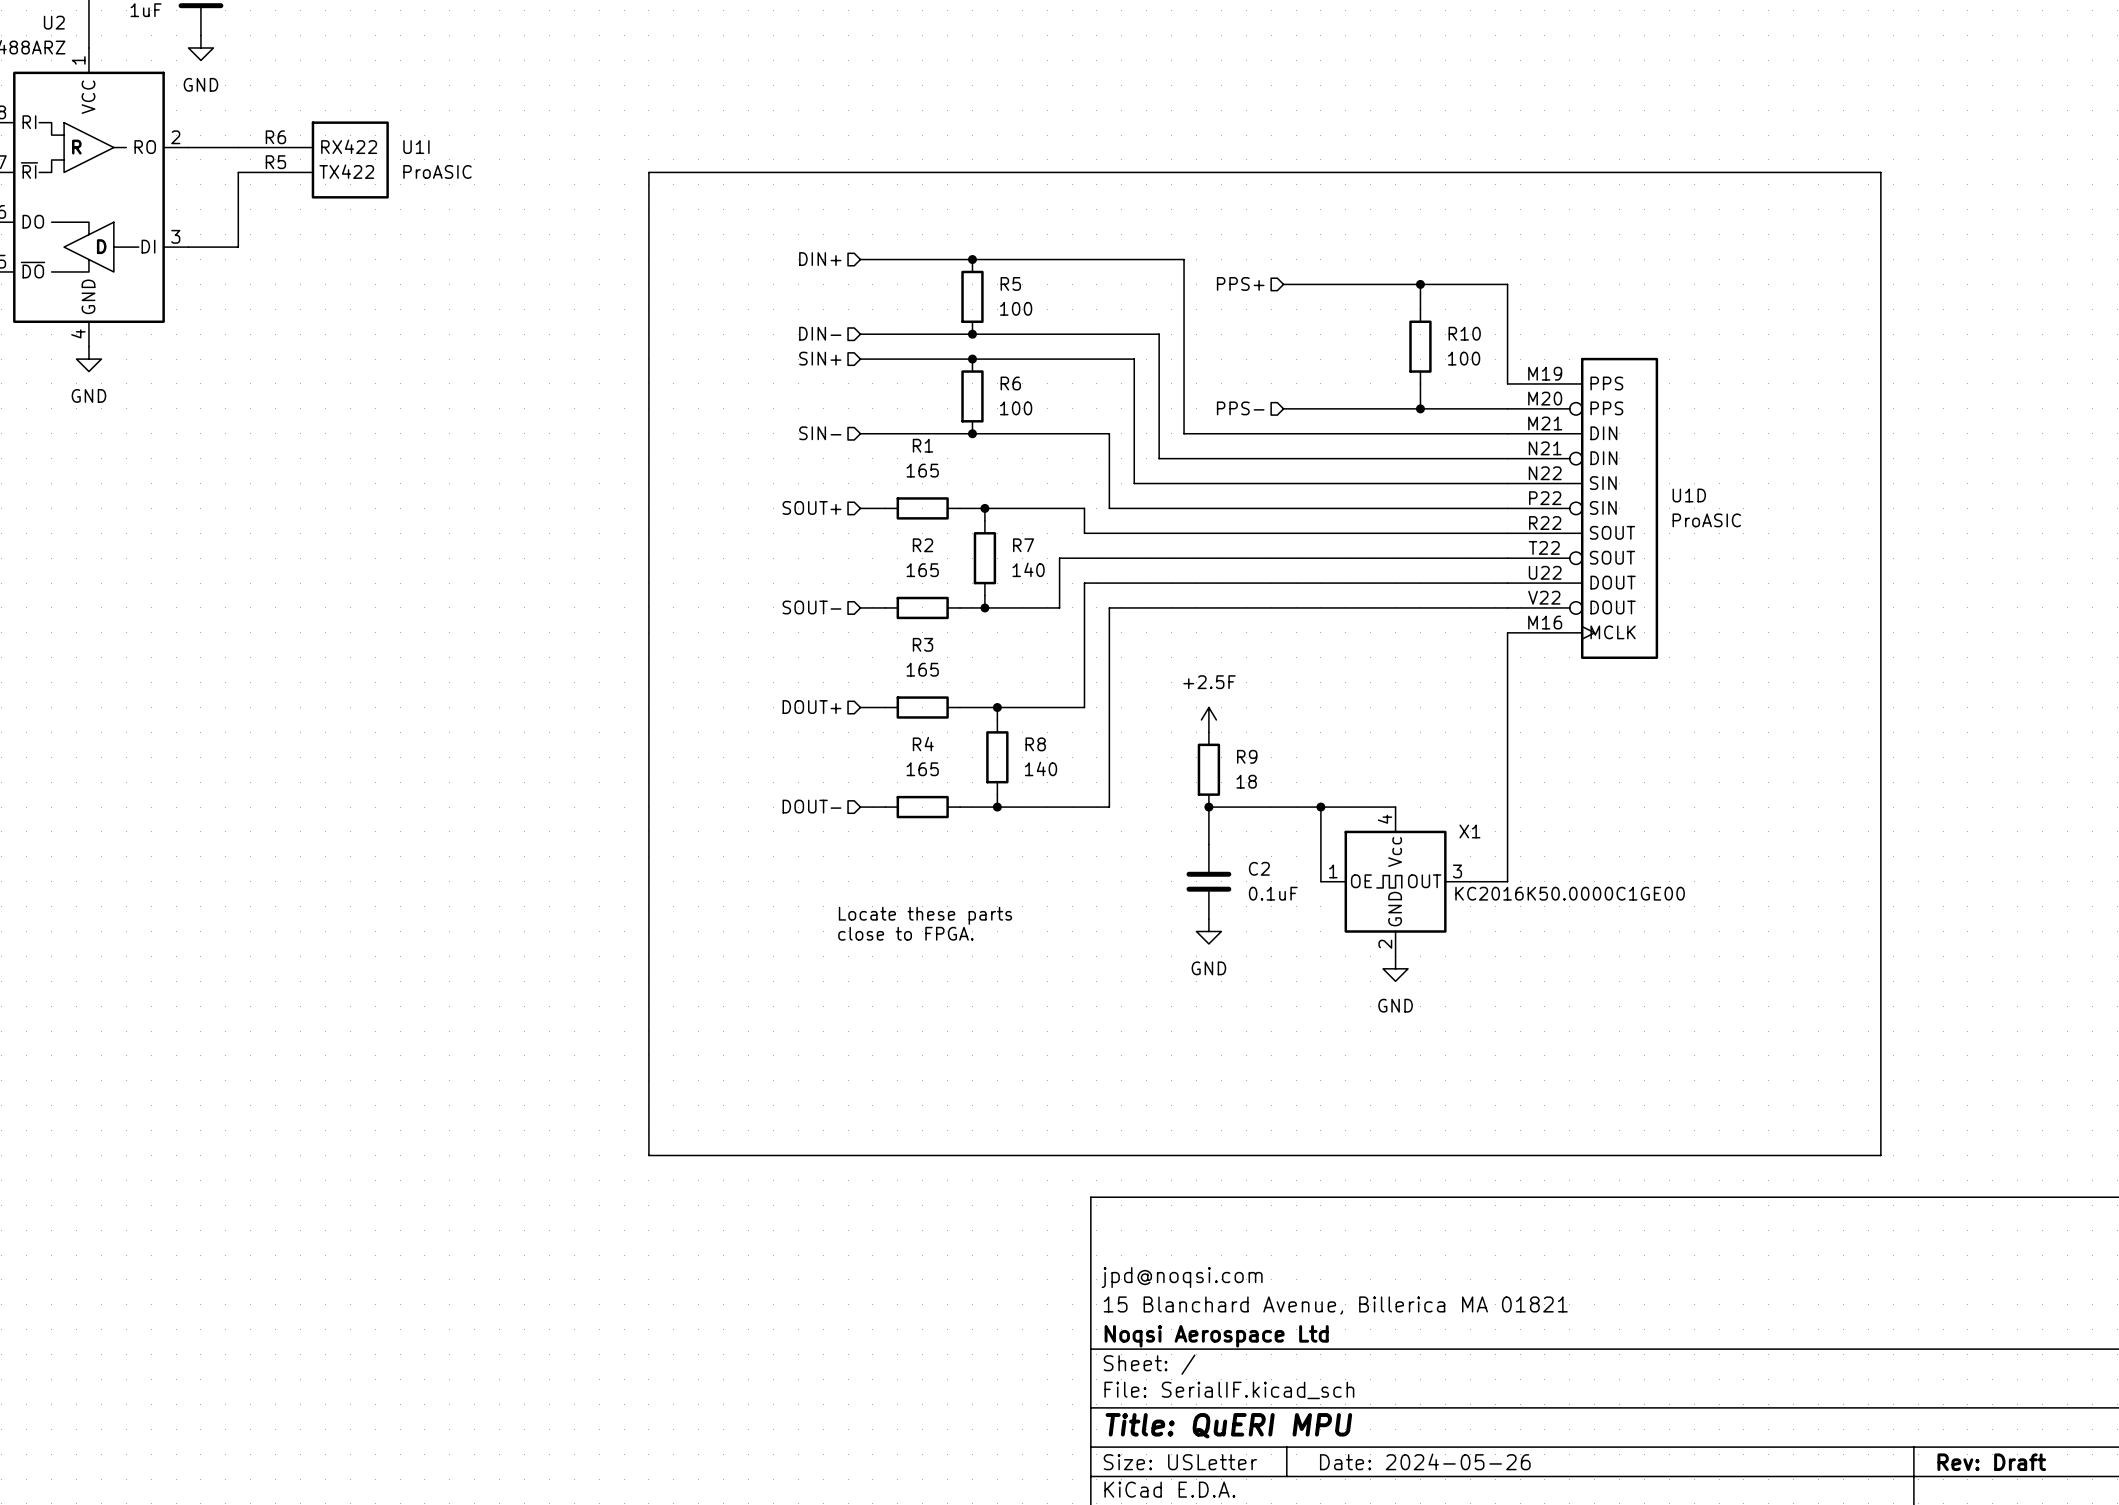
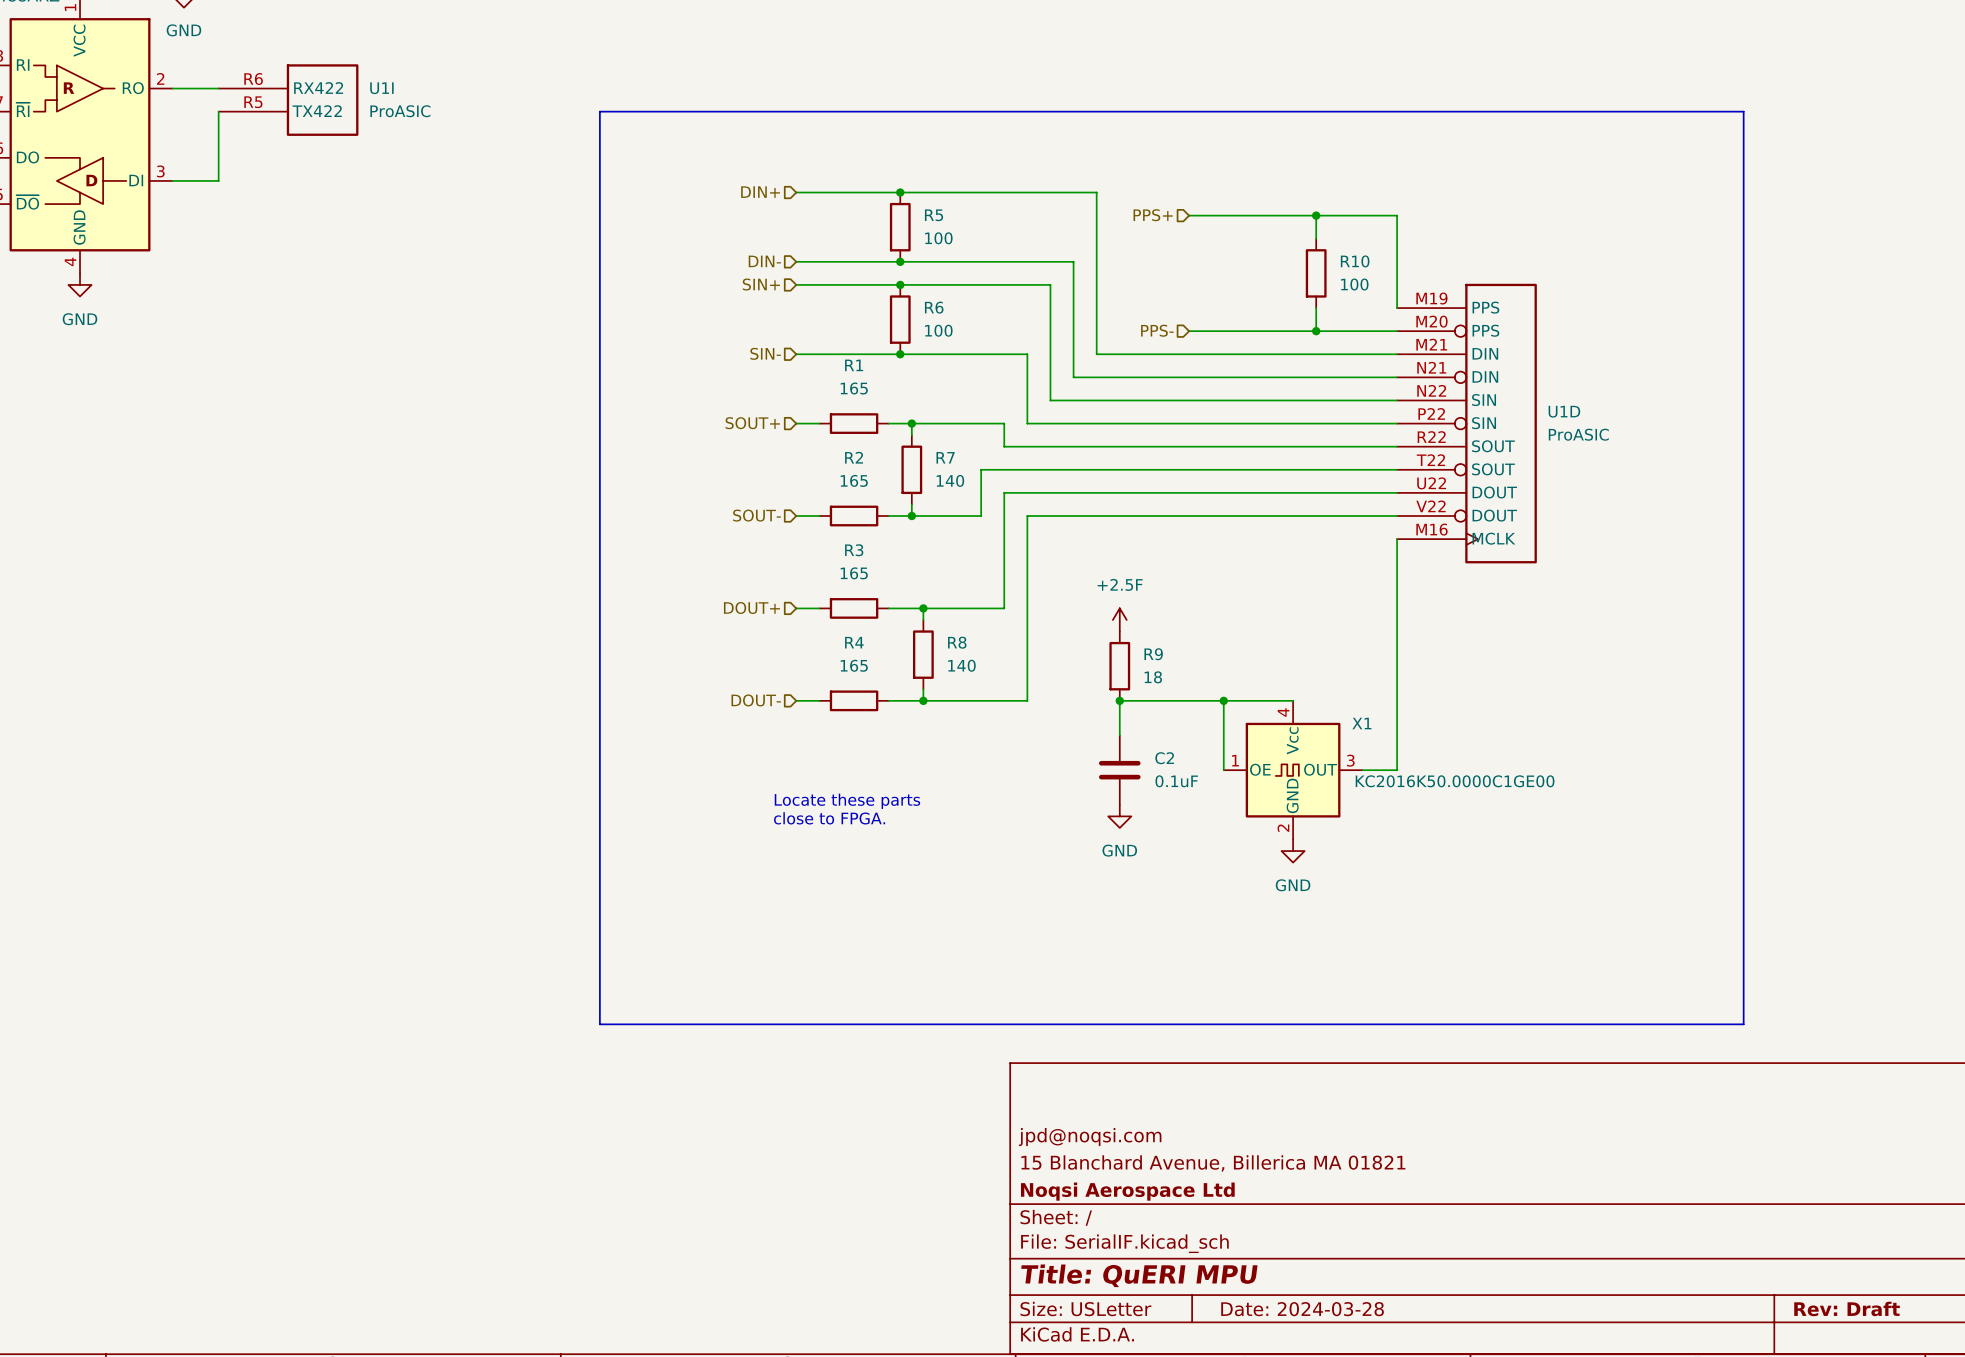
title block: Date: 2024-05-26 (1425, 1461) -> Date: 2024-03-28 (1302, 1309)

